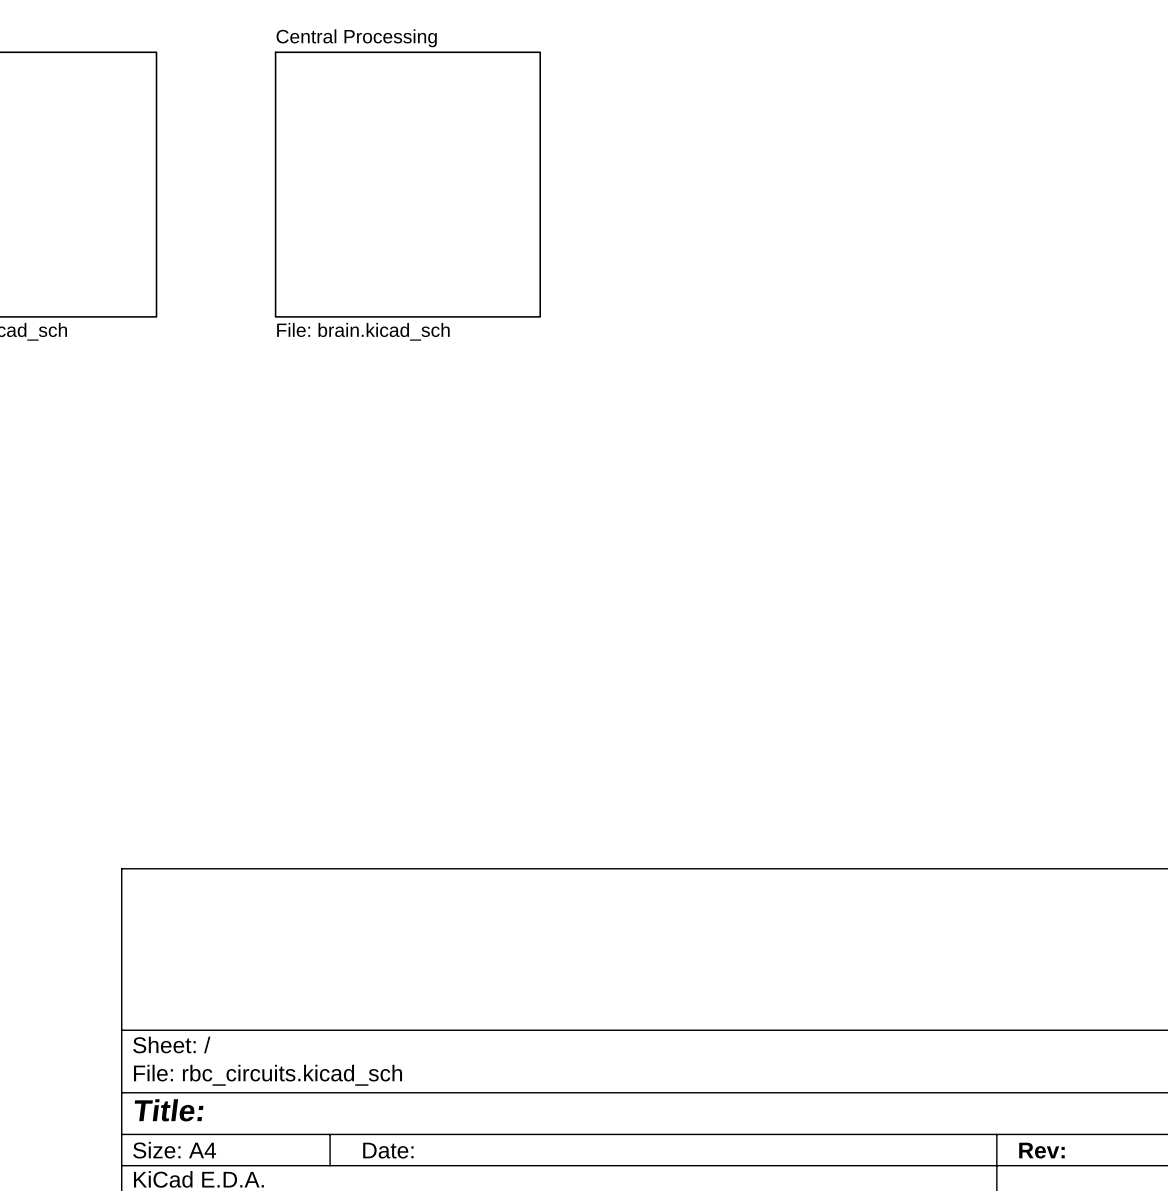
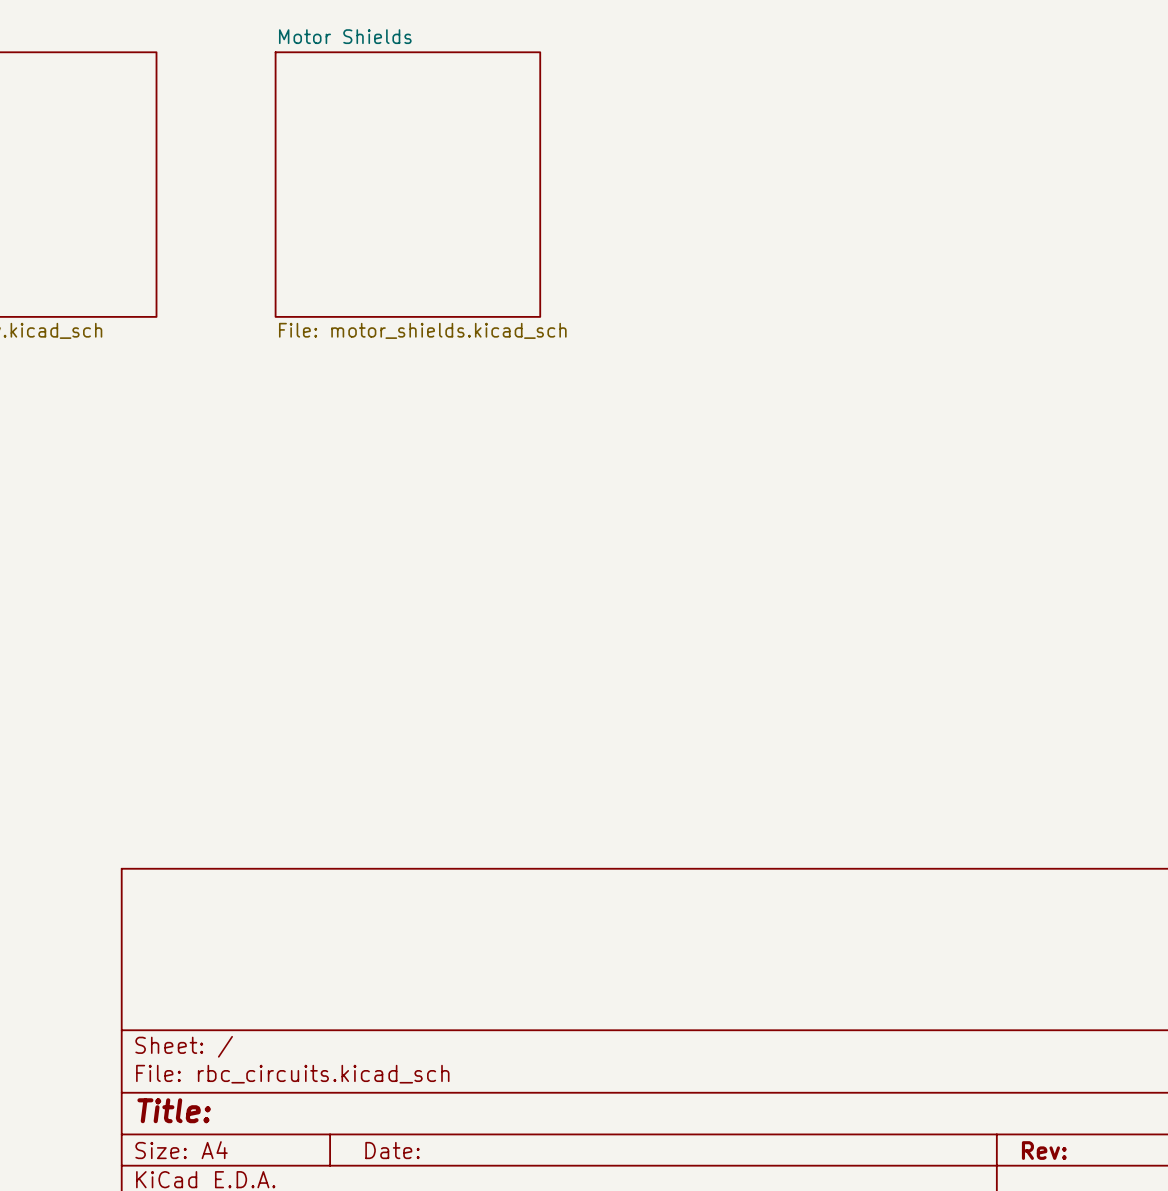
sheet Central Processing name: Central Processing (356, 38) -> Motor Shields (345, 36)
sheet Central Processing value: File: brain.kicad_sch (363, 331) -> File: motor_shields.kicad_sch (422, 330)

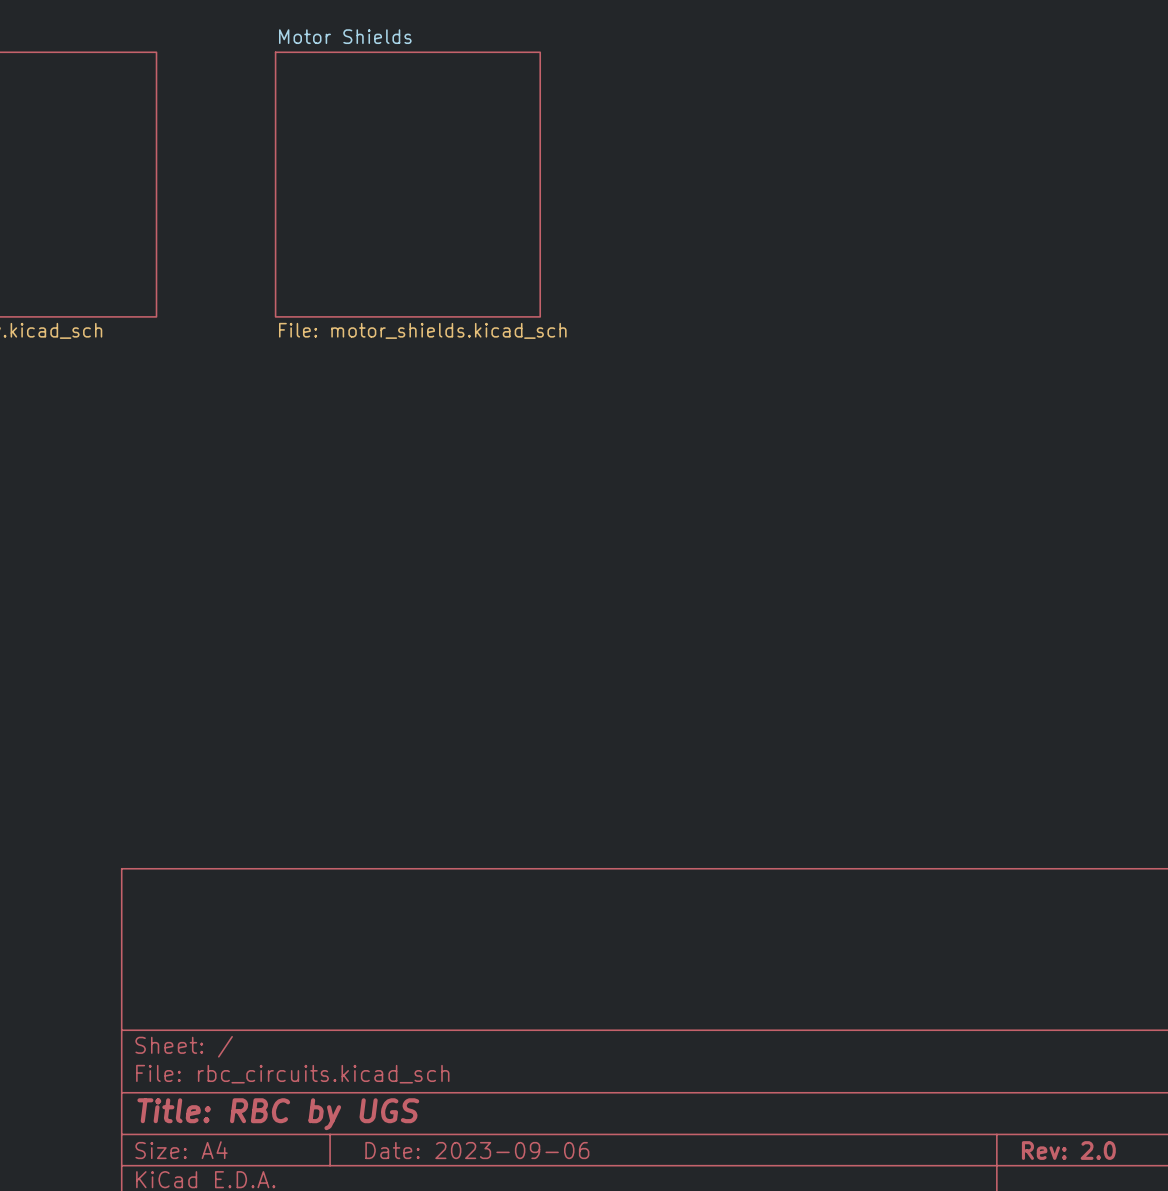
title block: Title: (174, 1110) -> Title: RBC by UGS (278, 1114)
title block: Date: (392, 1150) -> Date: 2023-09-06 (477, 1150)
title block: Rev: (1044, 1150) -> Rev: 2.0 (1068, 1150)

